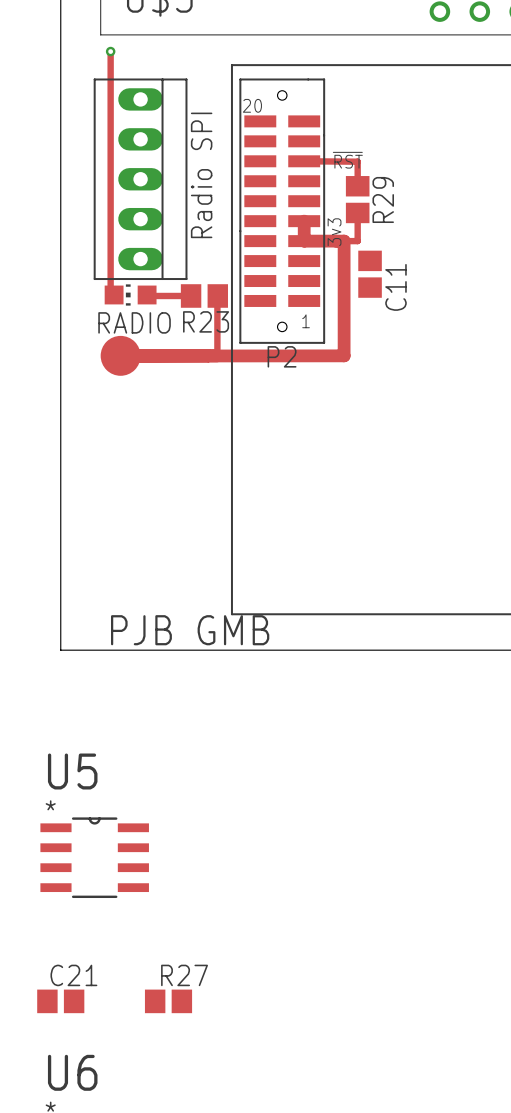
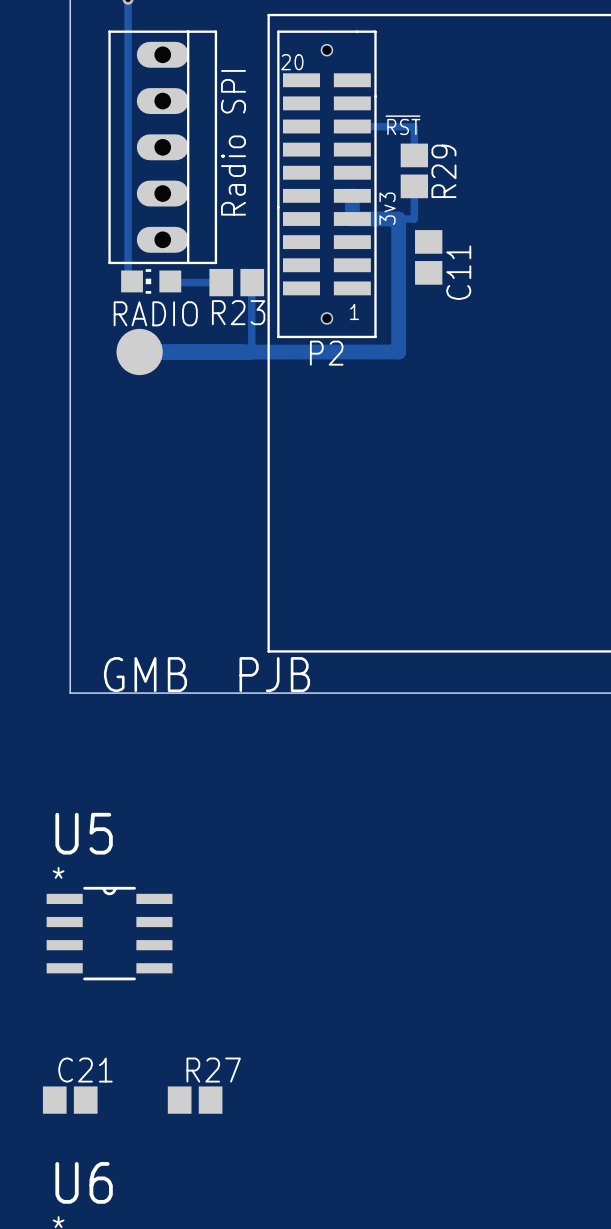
text position: PJB (141, 630) -> PJB (274, 674)
text position: GMB (233, 630) -> GMB (145, 674)

